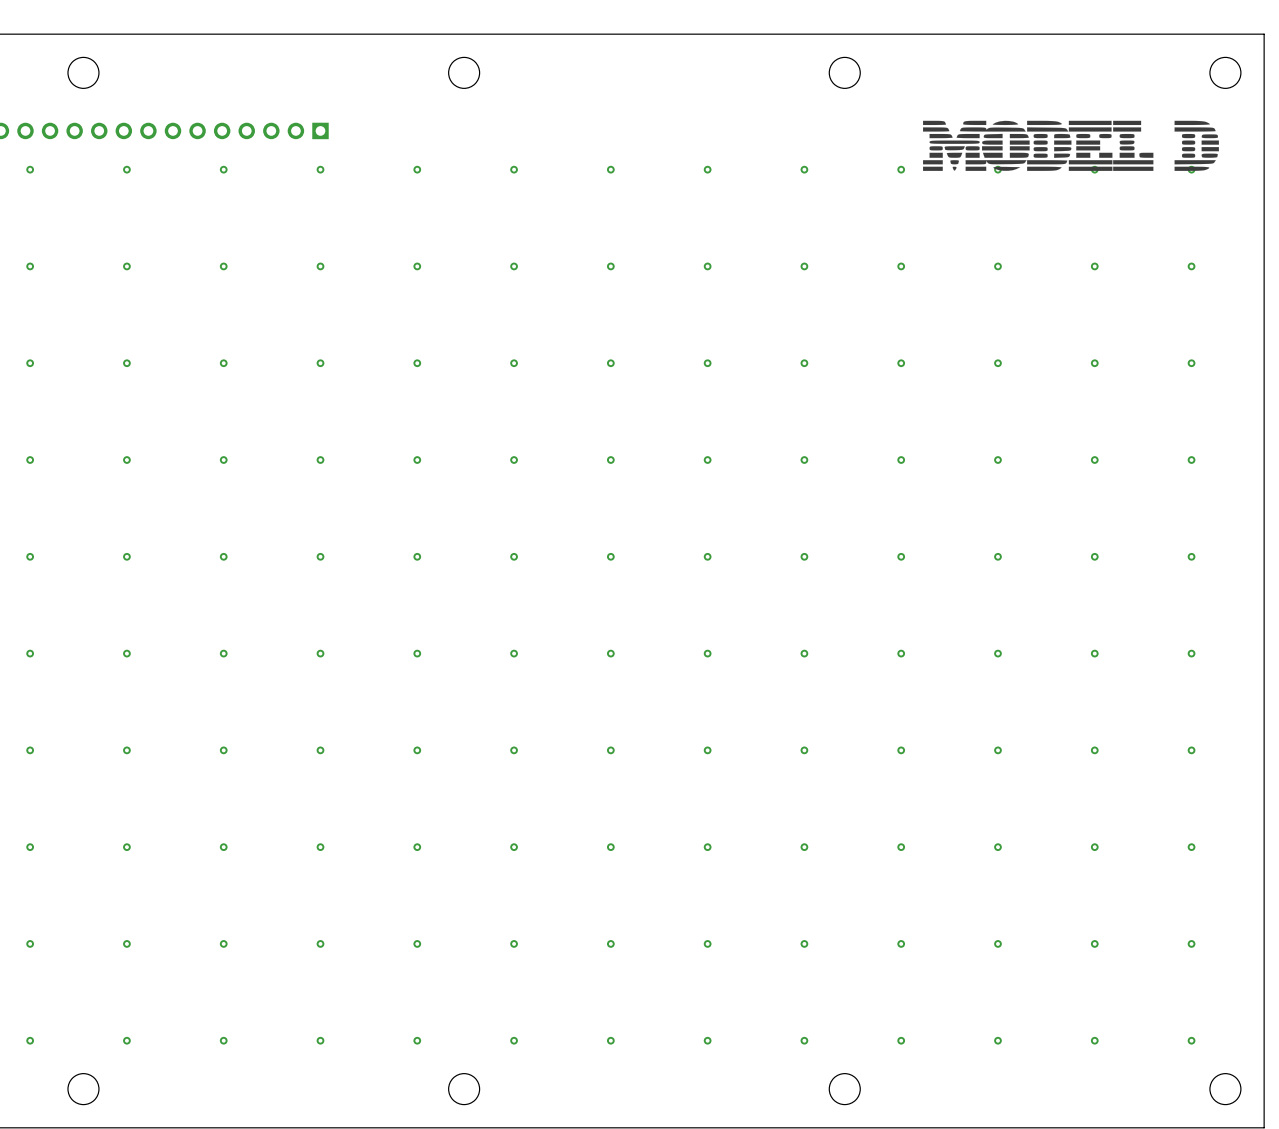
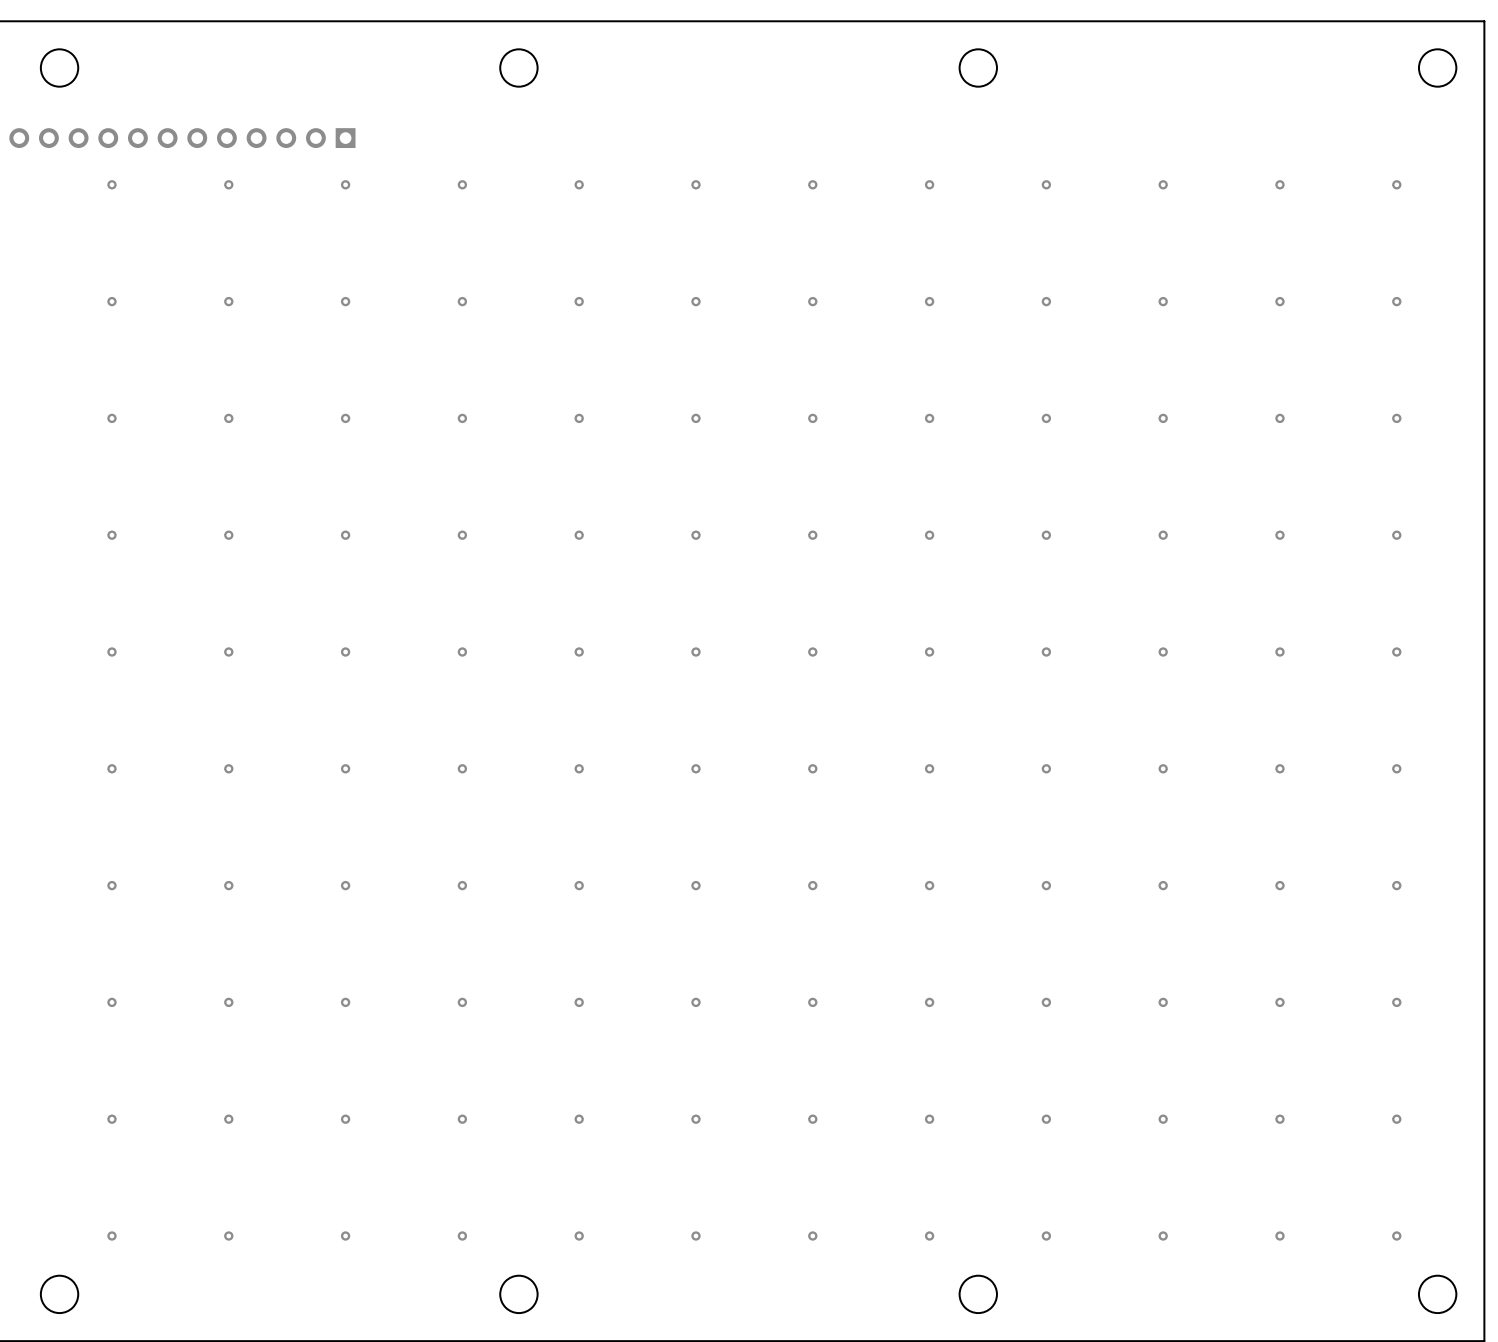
drawing: [923, 120, 1219, 171] -> none

